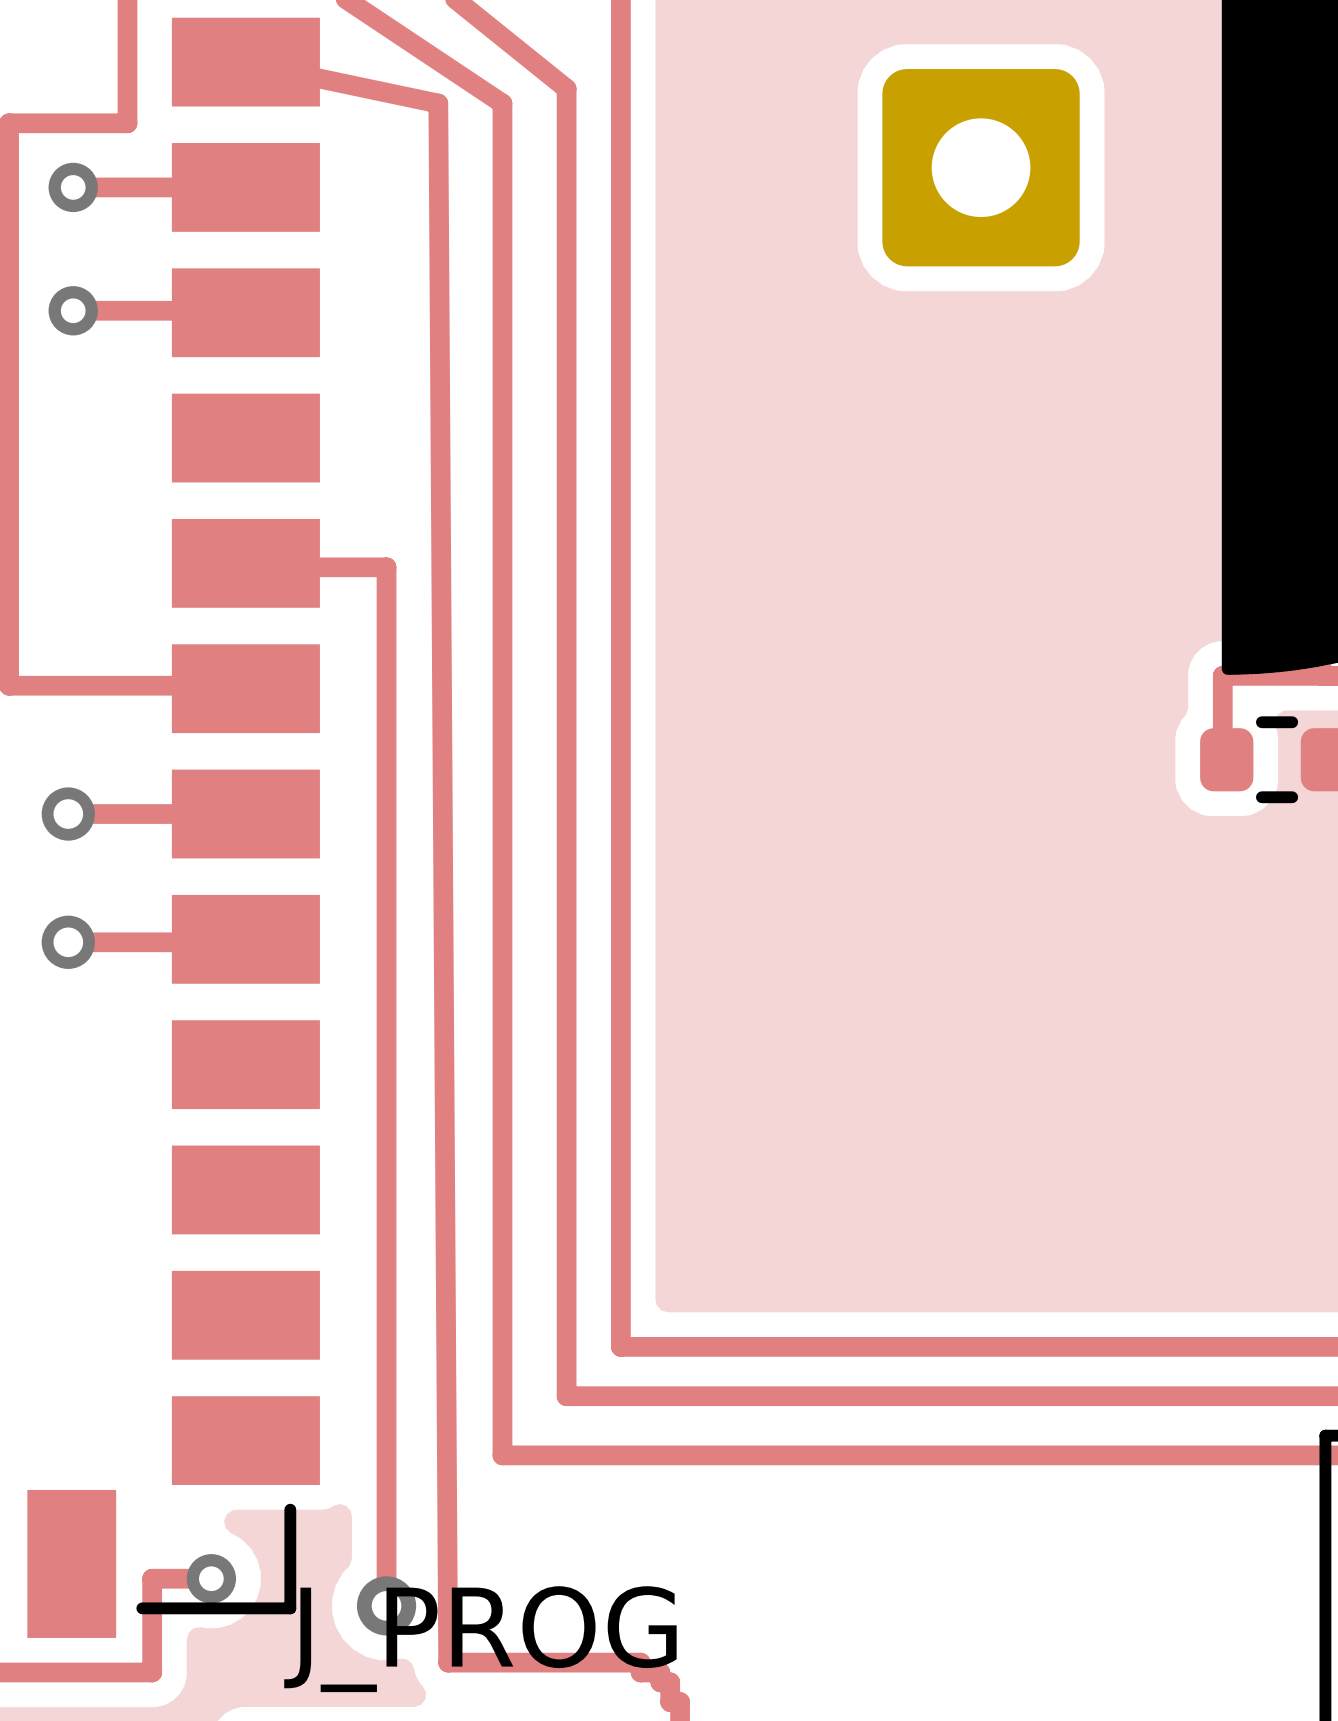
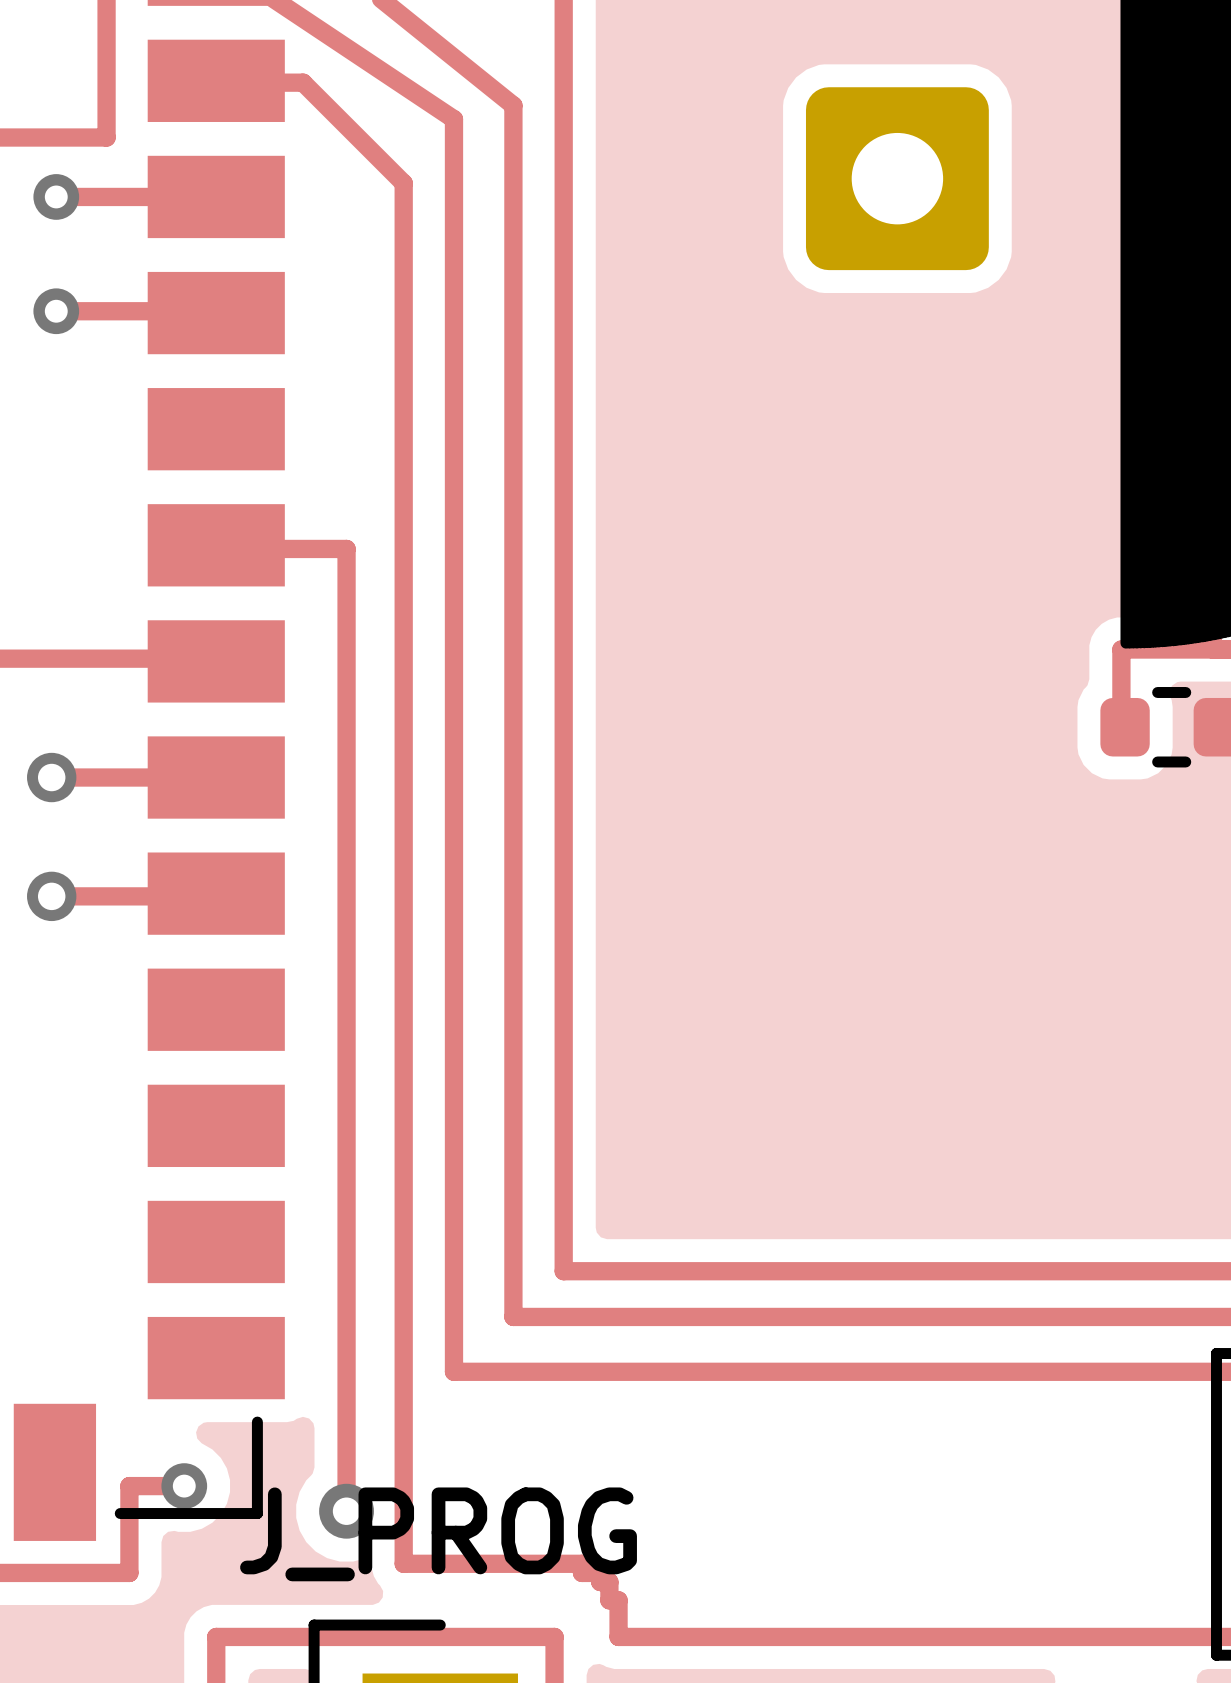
track: (250, 64) (438, 103) (448, 1662) -> (220, 82) (303, 82) (403, 183) (403, 1563)

